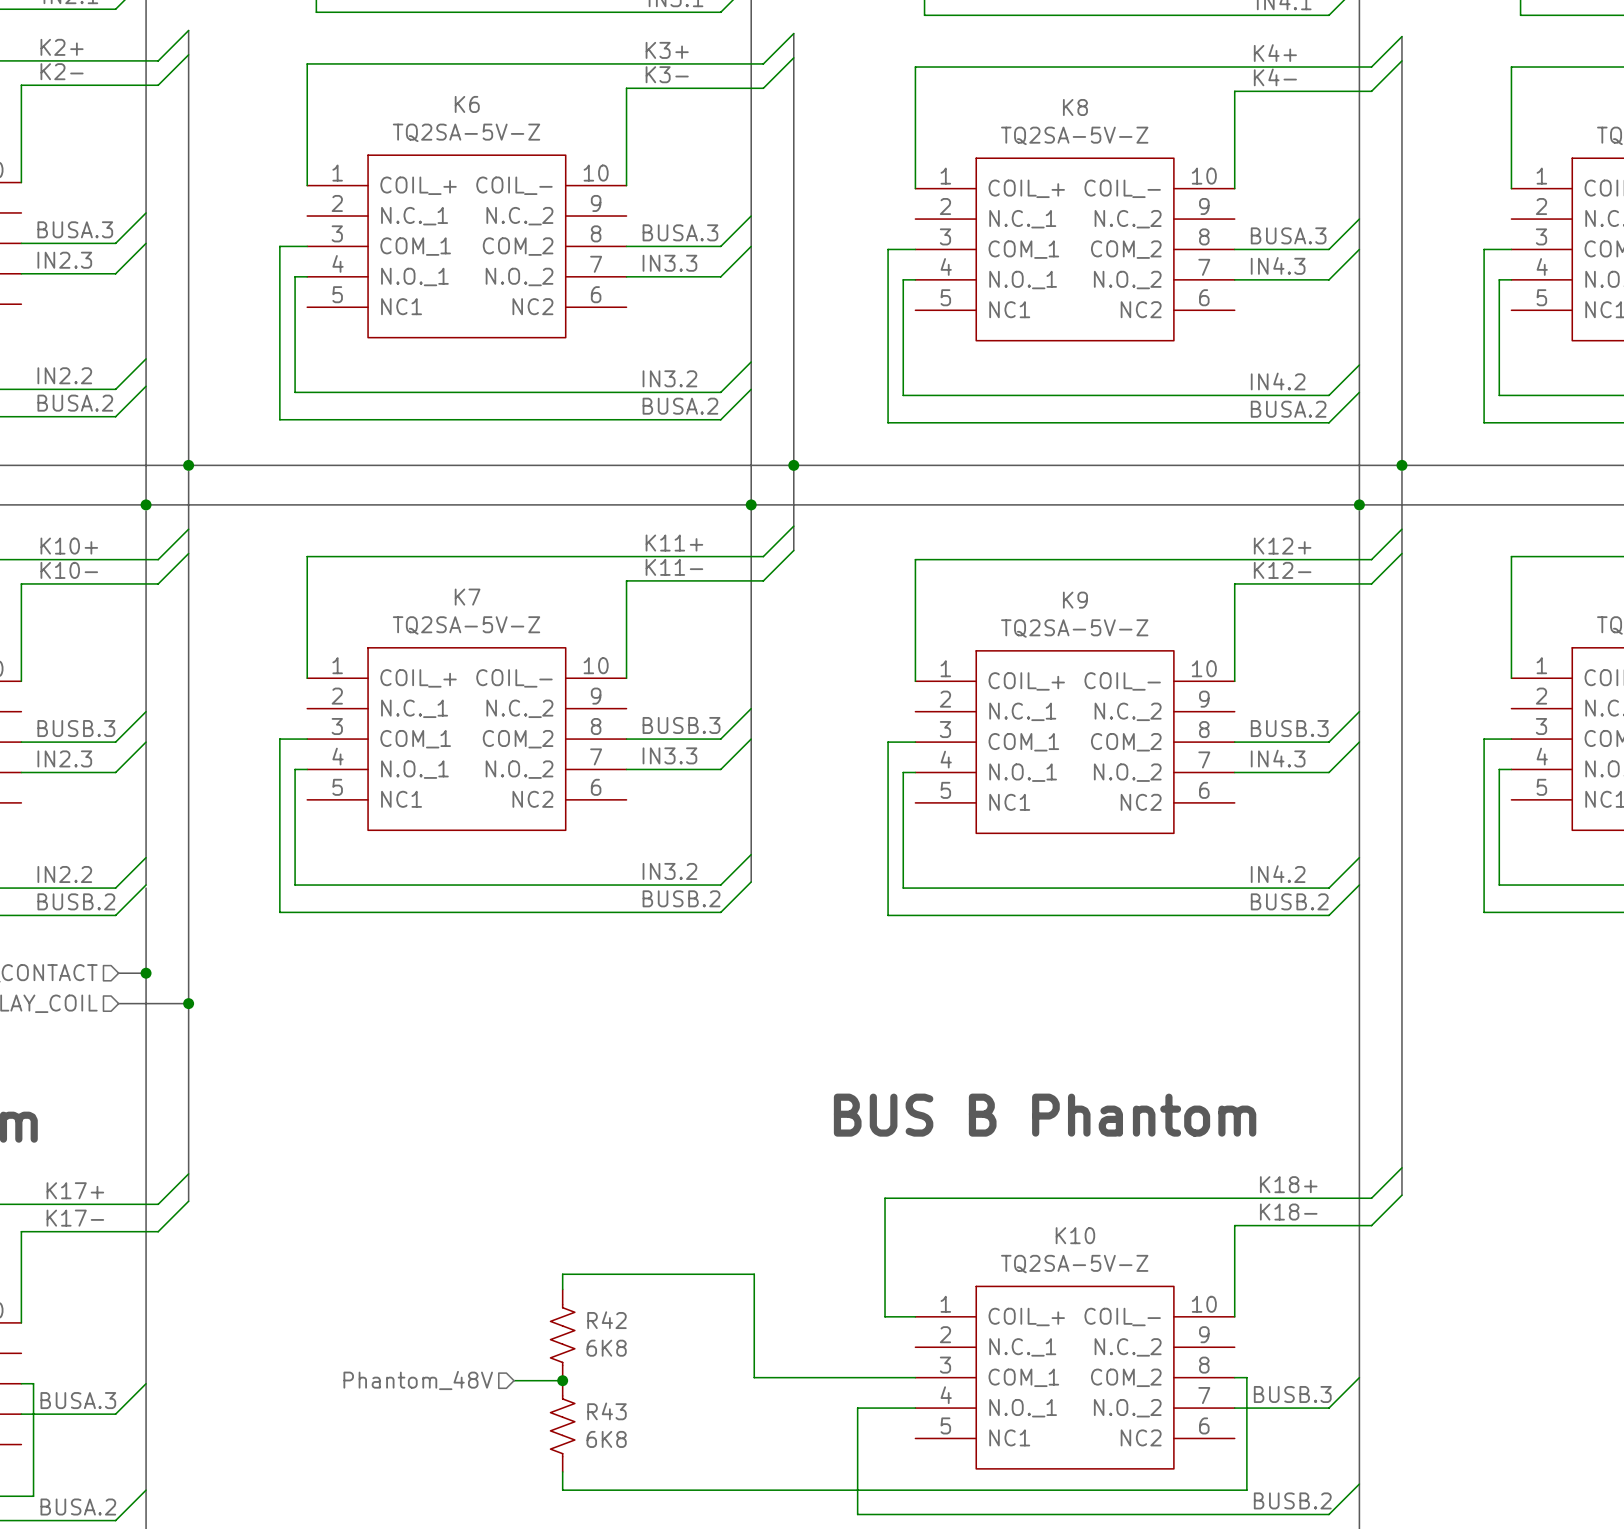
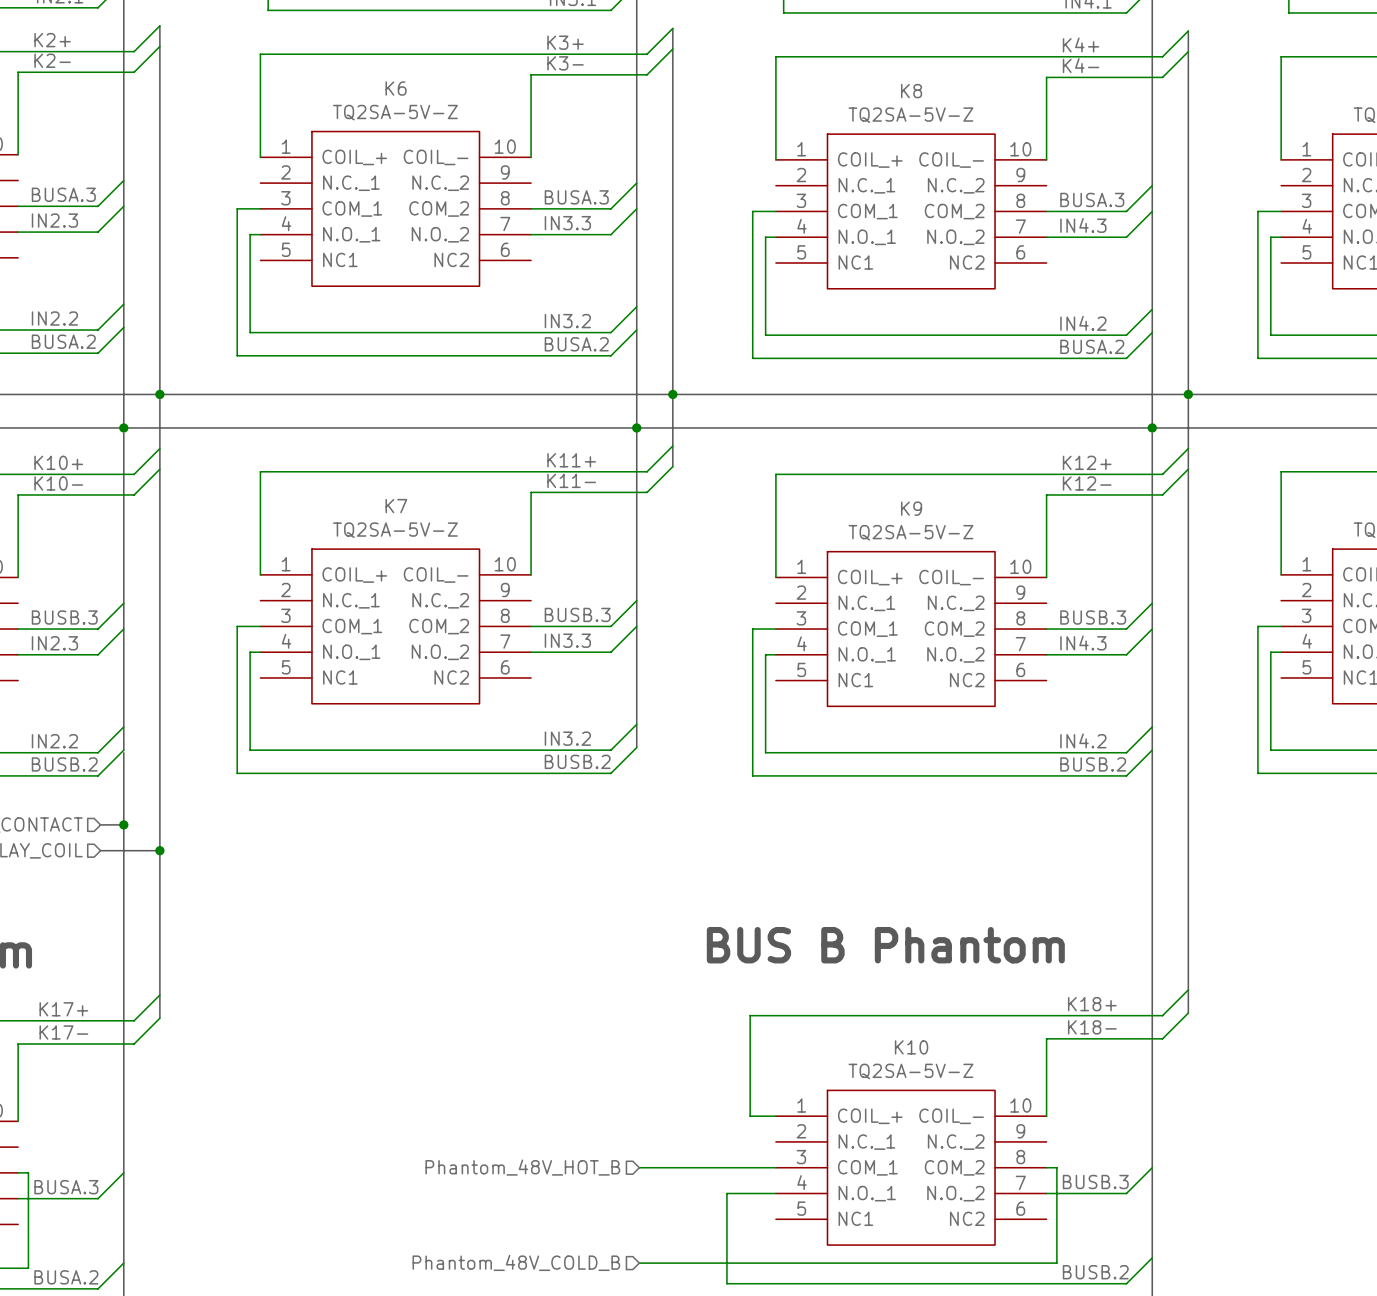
wire: (562, 1289) (562, 1274) (754, 1274) (754, 1377) -> none
R42: 6K8 (562, 1335) -> none
hierarchical label: Phantom_48V (418, 1380) -> Phantom_48V_HOT_B (522, 1167)
wire: (514, 1380) (562, 1380) -> none
junction: (562, 1380) -> none
R43: 6K8 (562, 1426) -> none
wire: (562, 1471) (562, 1490) (754, 1490) -> none
hierarchical label: none -> Phantom_48V_COLD_B (516, 1262)

